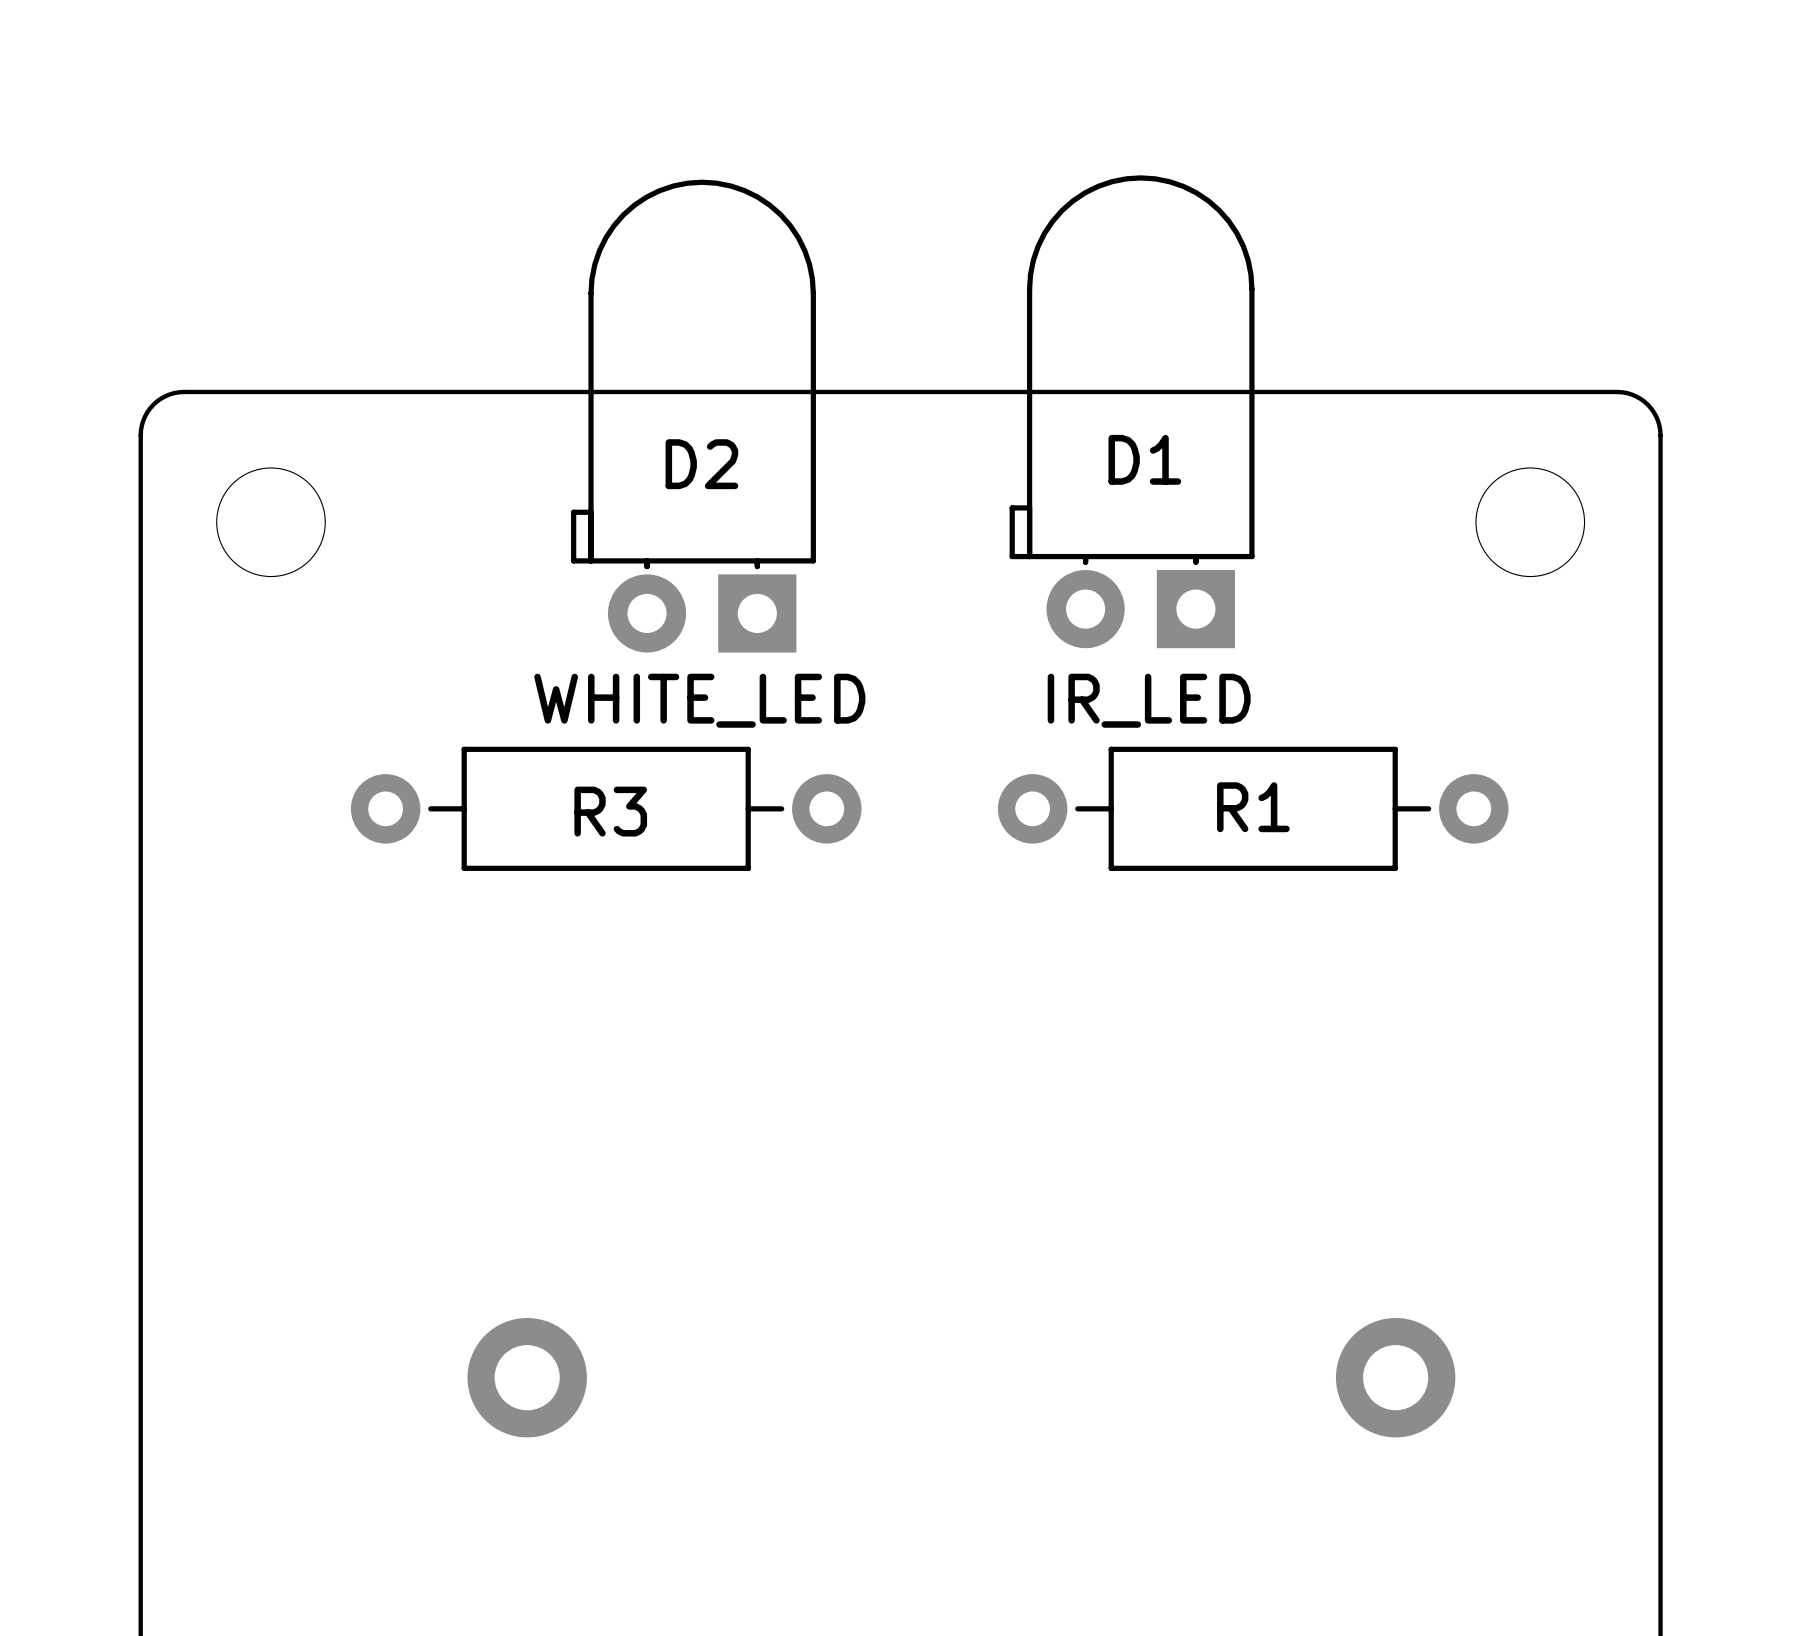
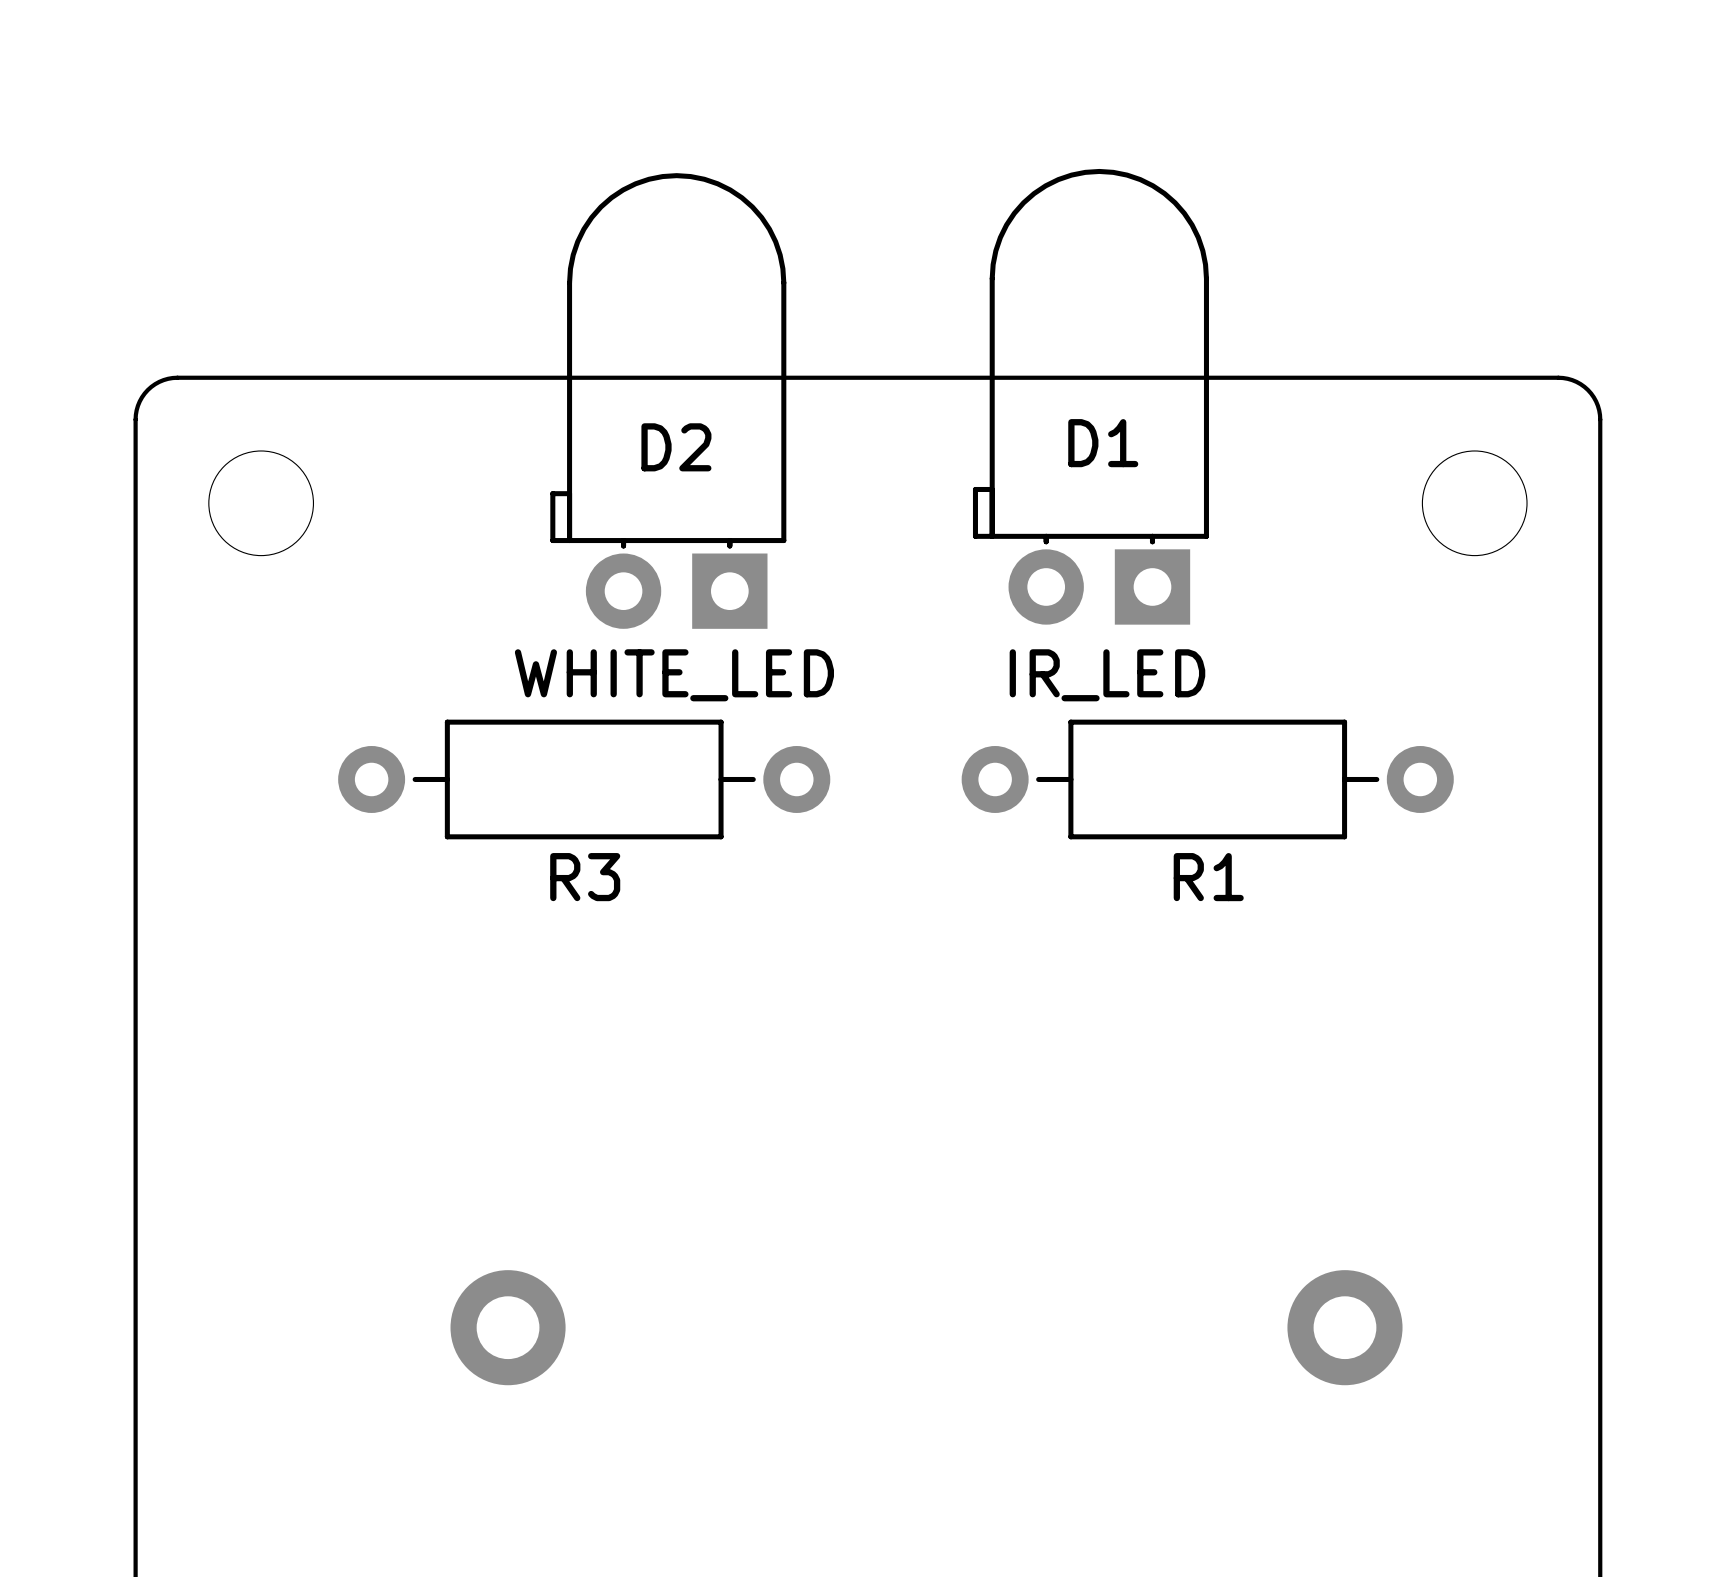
R1 name position: R1 (1253, 807) -> R1 (1208, 877)
R3 name position: R3 (610, 811) -> R3 (585, 877)

